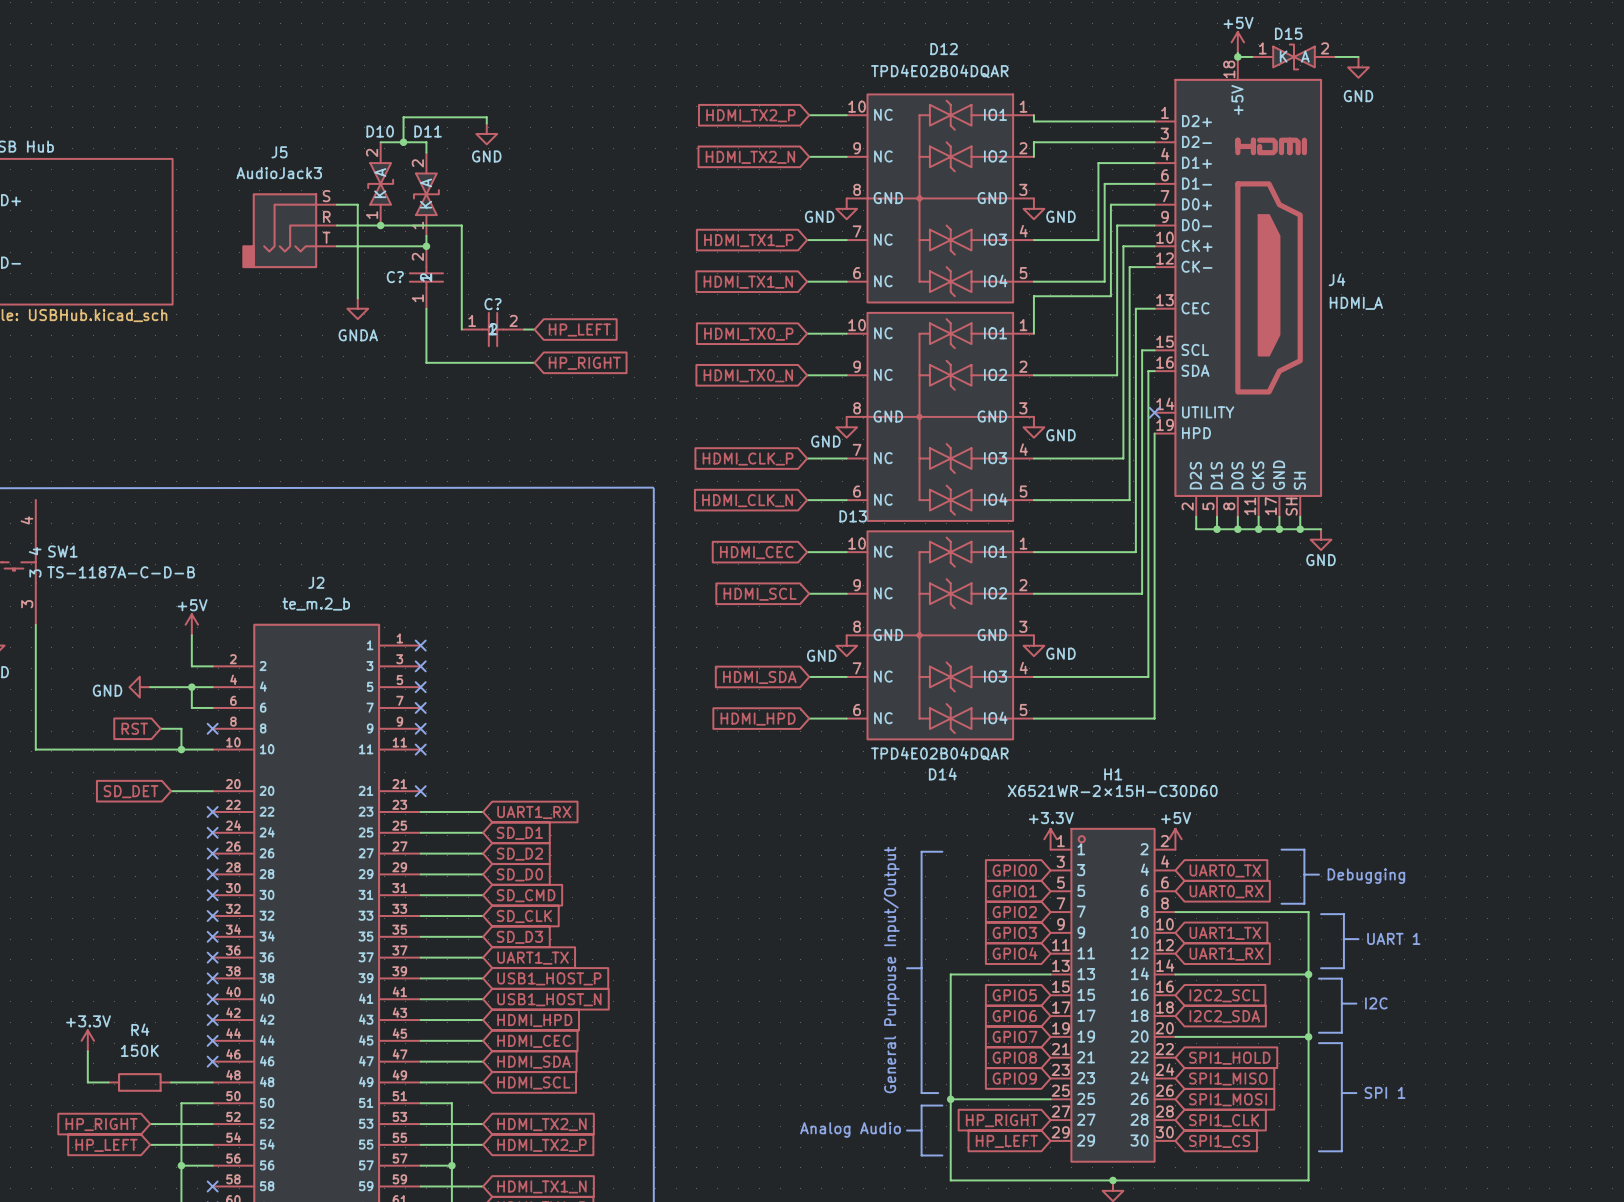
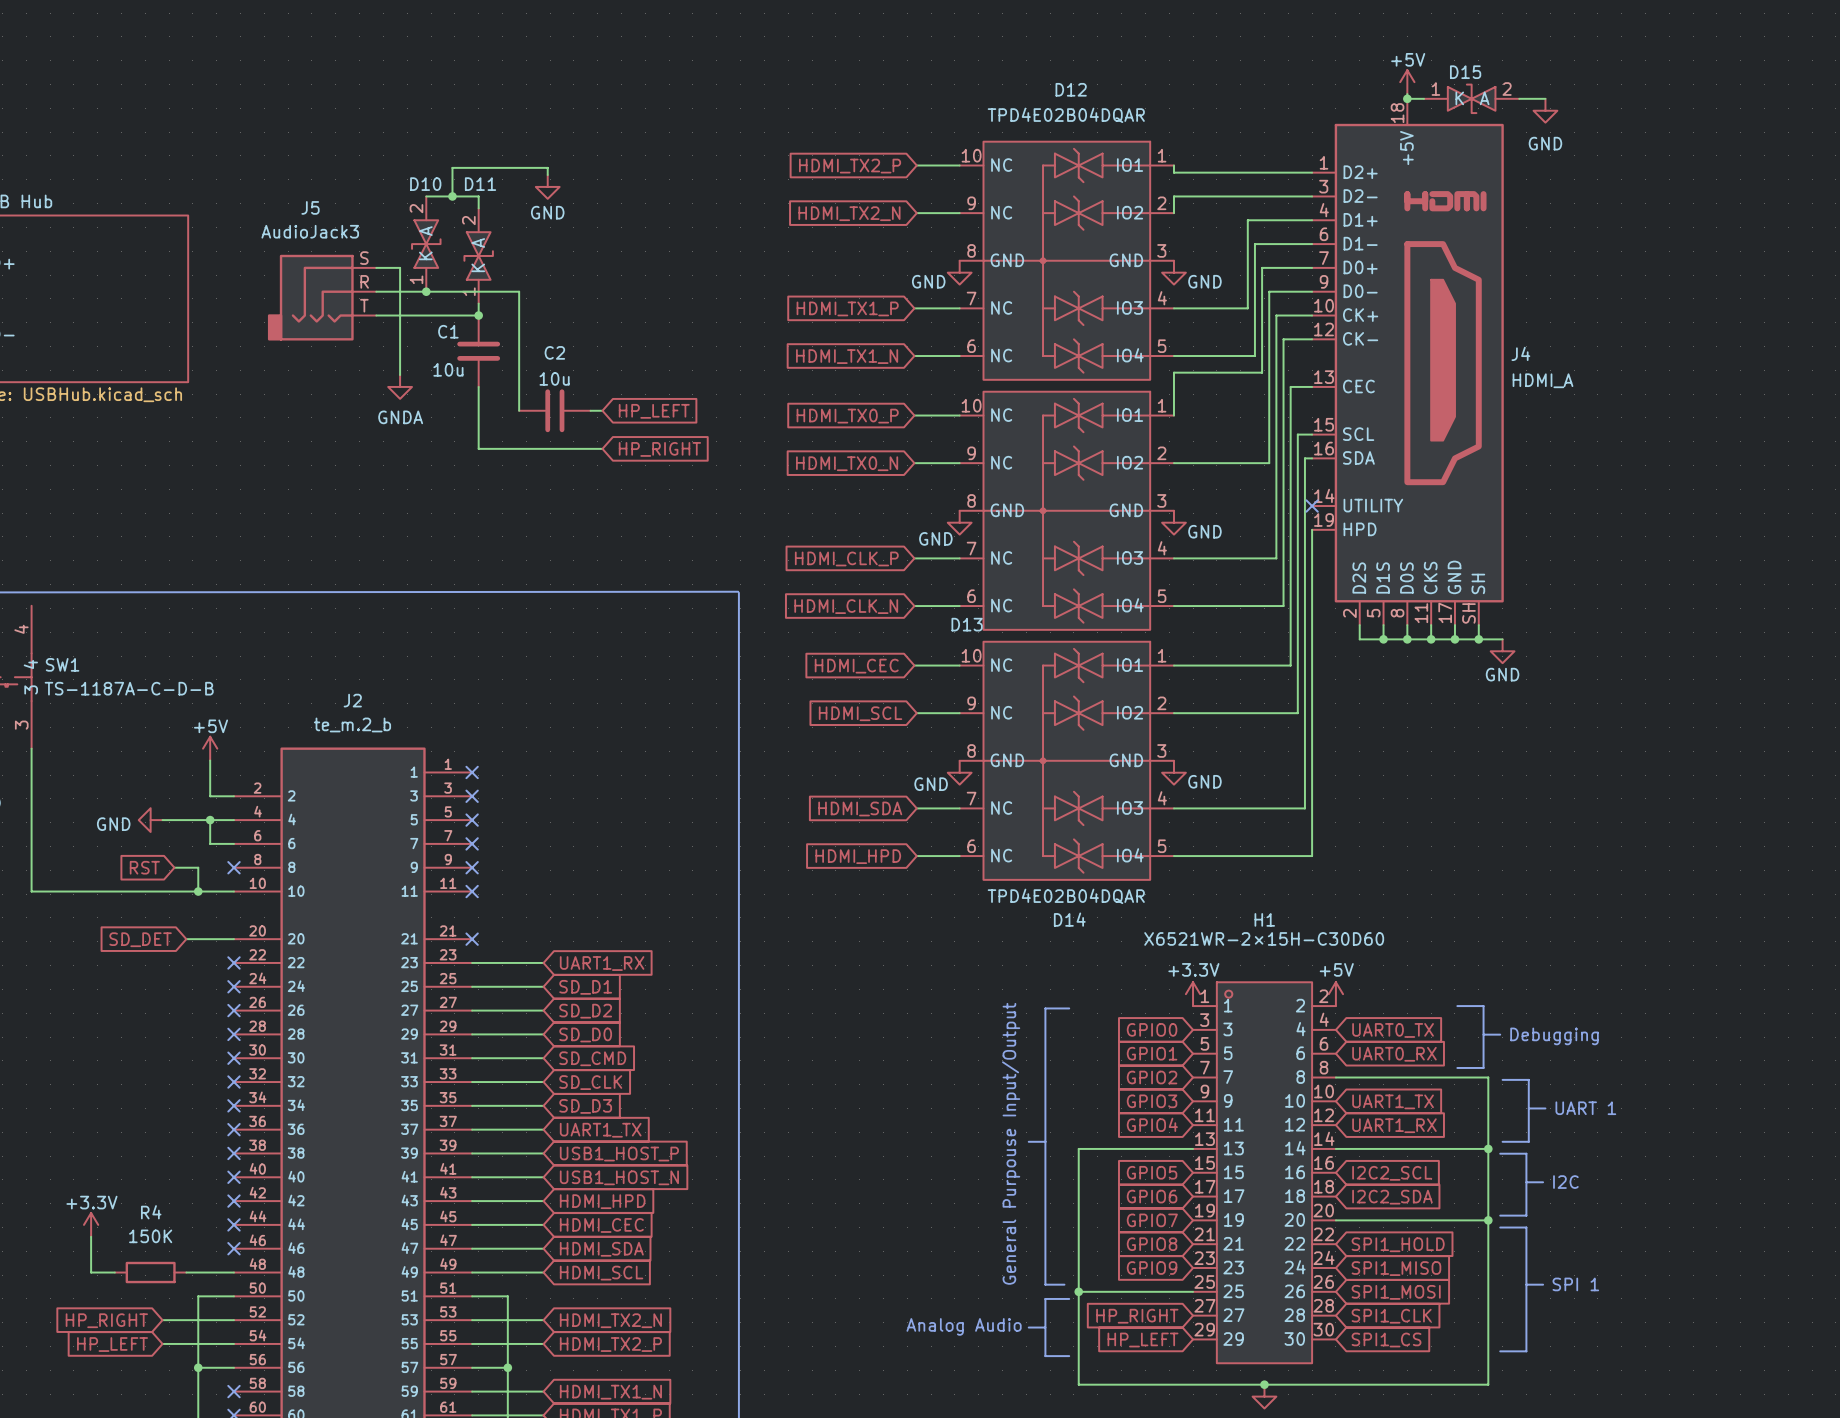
C?: (426, 277) -> none
C1: none -> 10u (478, 351)
C?: (493, 329) -> none
C2: none -> 10u (554, 410)

